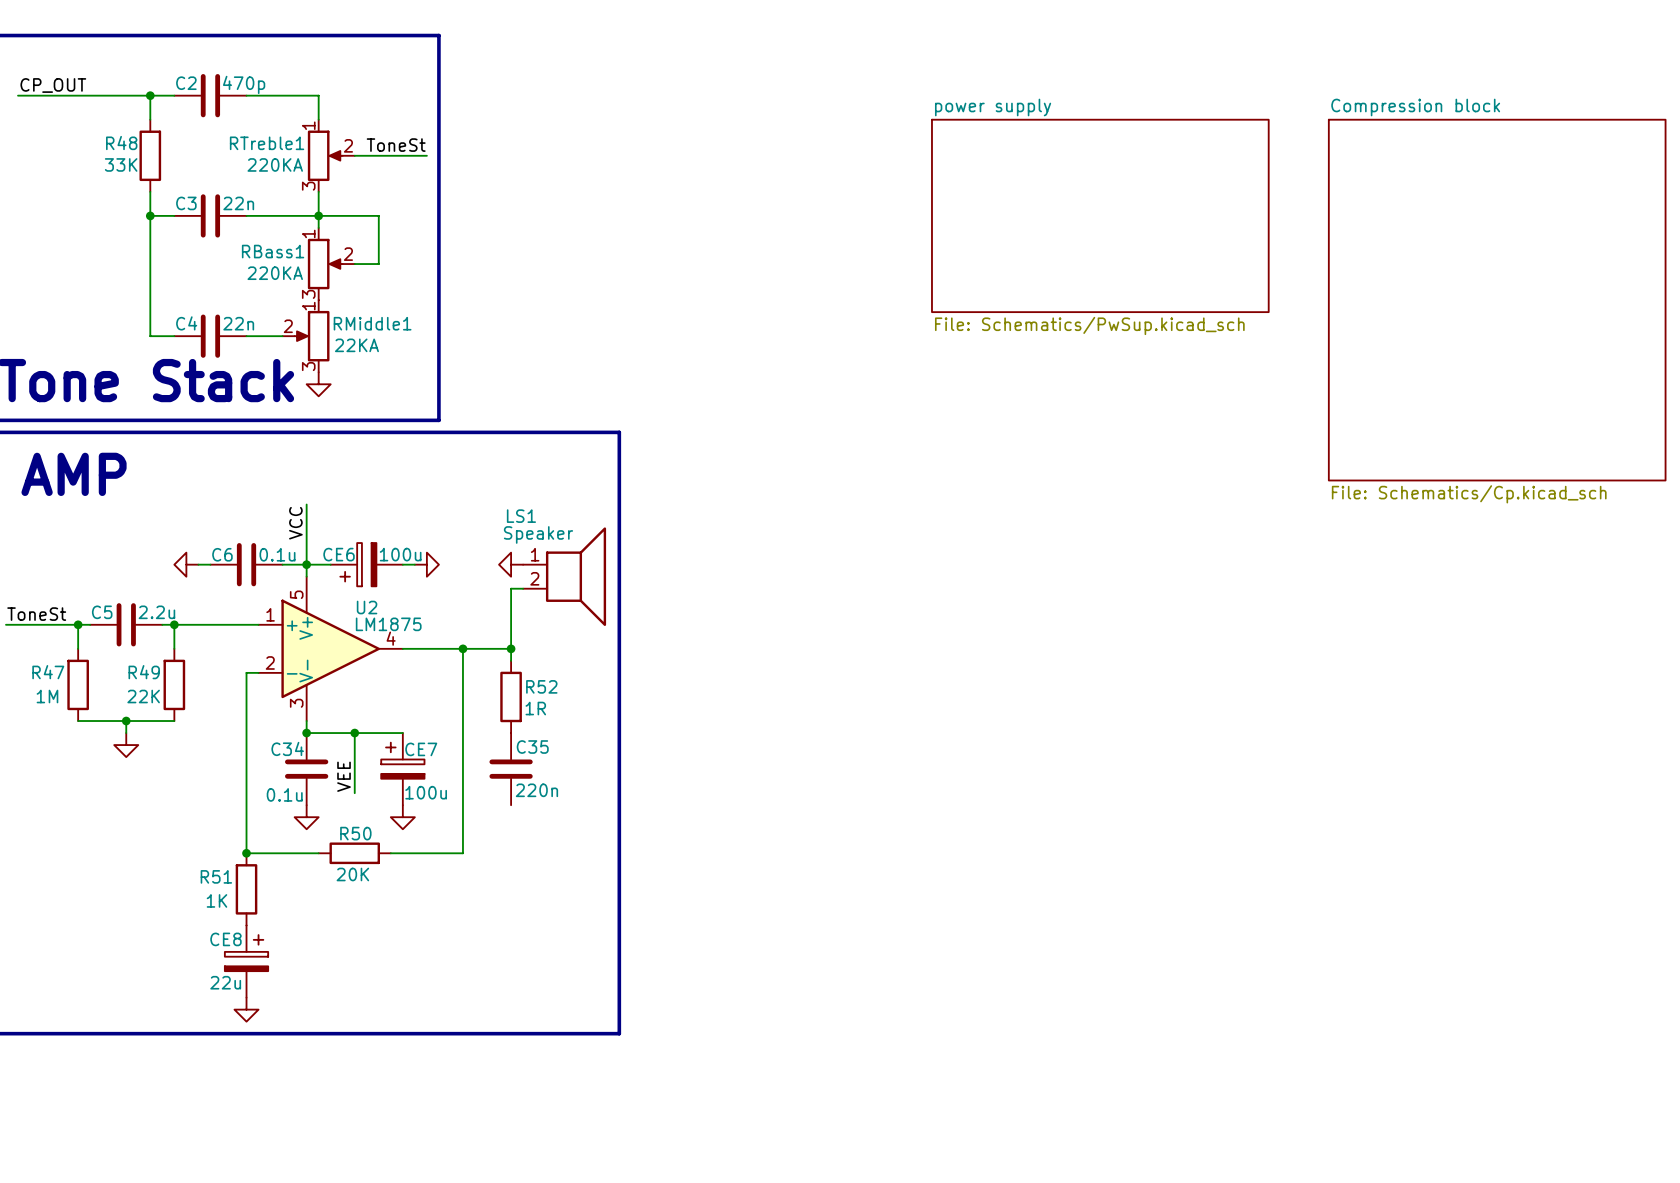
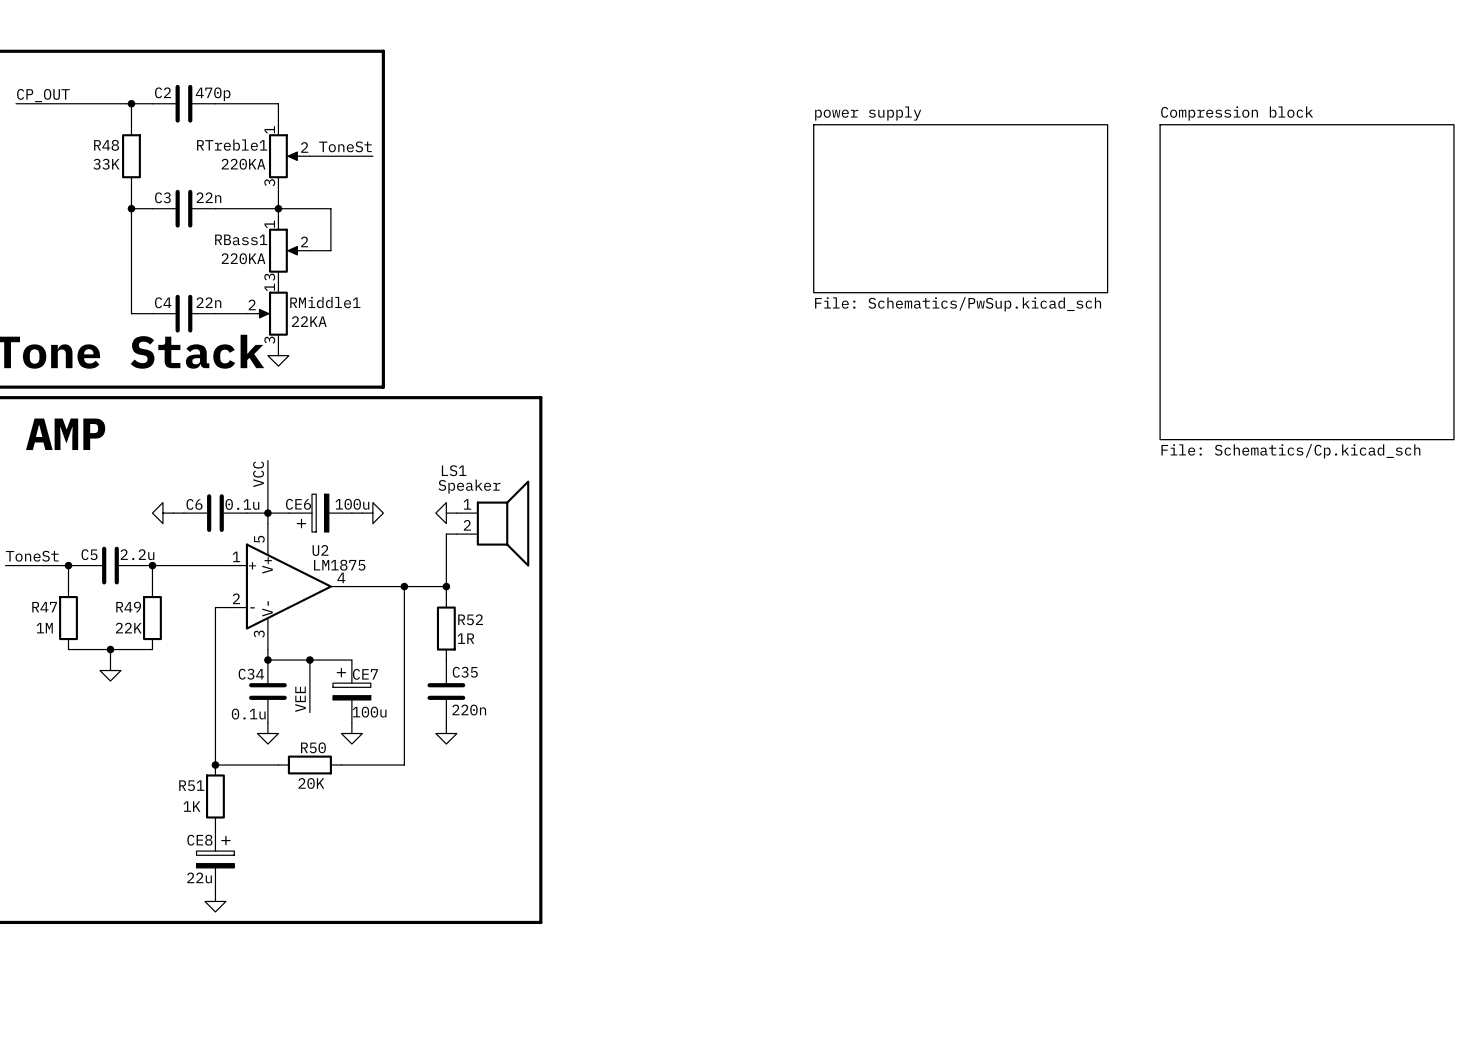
power symbol: none -> (446, 733)

